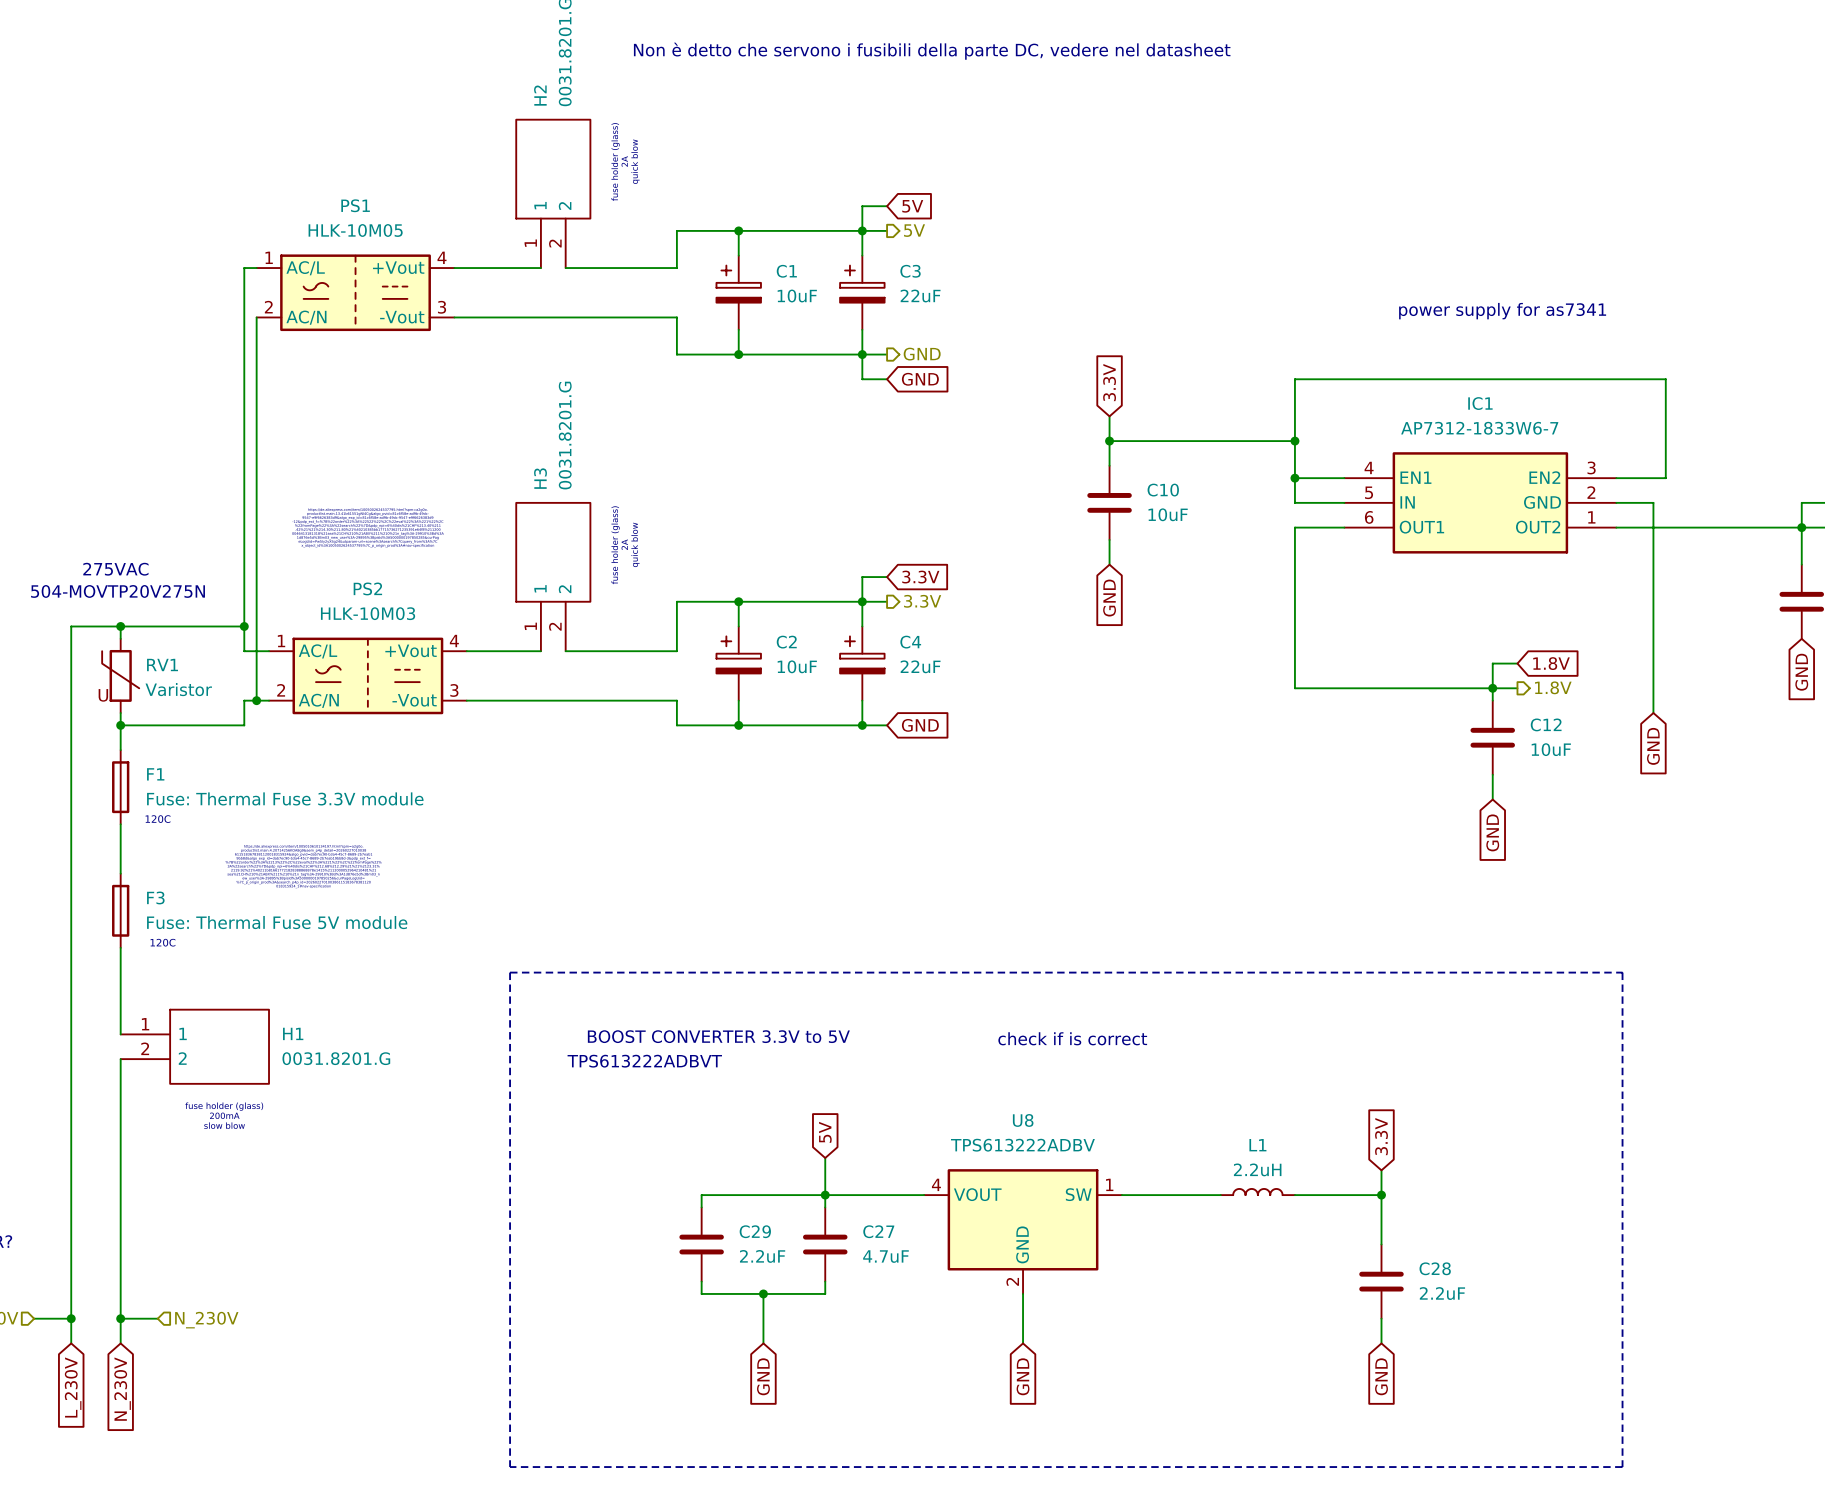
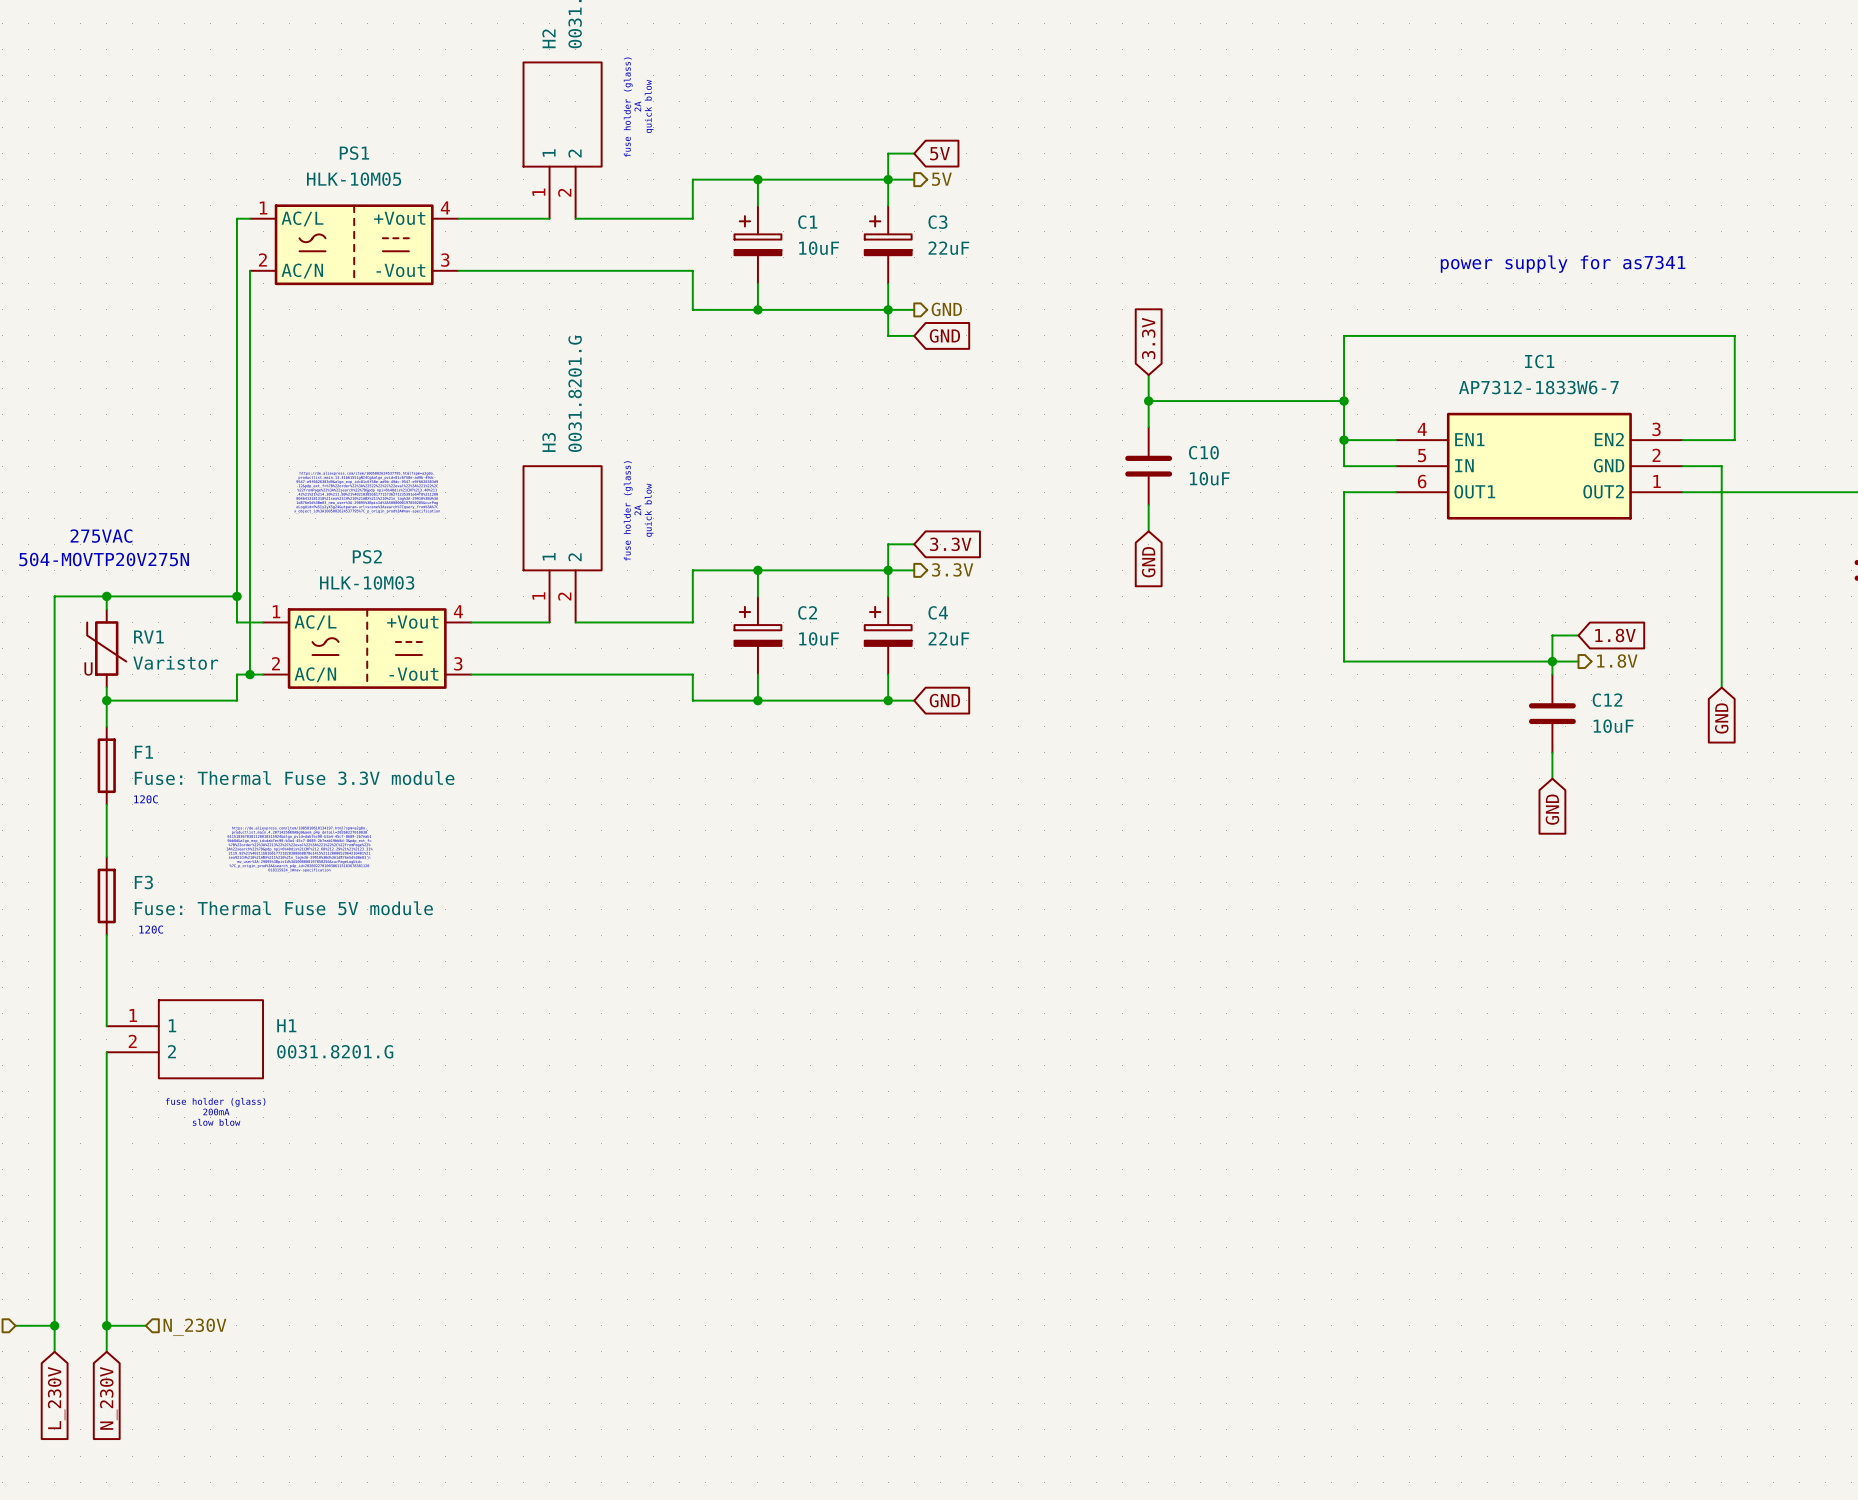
line: (510, 972) (1622, 972) (1622, 1467) (510, 1467) (510, 972) -> none
text: BOOST CONVERTER 3.3V to 5V (718, 1036) -> none
text: check if is correct (1072, 1038) -> none
text: TPS613222ADBVT (644, 1061) -> none
global label: 5V (825, 1132) -> none
global label: 3.3V (1381, 1136) -> none
wire: (825, 1158) (825, 1207) -> none
wire: (1381, 1170) (1381, 1244) -> none
L1: 2.2uH (1257, 1192) -> none
junction: (825, 1195) -> none
wire: (924, 1195) (701, 1195) (701, 1207) -> none
wire: (1121, 1195) (1220, 1195) -> none
wire: (1294, 1195) (1381, 1195) -> none
junction: (1381, 1195) -> none
U8: TPS613222ADBV (1023, 1231) -> none
C29: 2.2uF (701, 1244) -> none
C27: 4.7uF (825, 1244) -> none
wire: (701, 1281) (701, 1293) (825, 1293) (825, 1281) -> none
C28: 2.2uF (1381, 1281) -> none
wire: (763, 1293) (763, 1343) -> none
junction: (763, 1293) -> none
wire: (1023, 1293) (1023, 1343) -> none
wire: (1381, 1318) (1381, 1343) -> none
global label: GND (763, 1376) -> none
global label: GND (1023, 1376) -> none
global label: GND (1381, 1376) -> none

